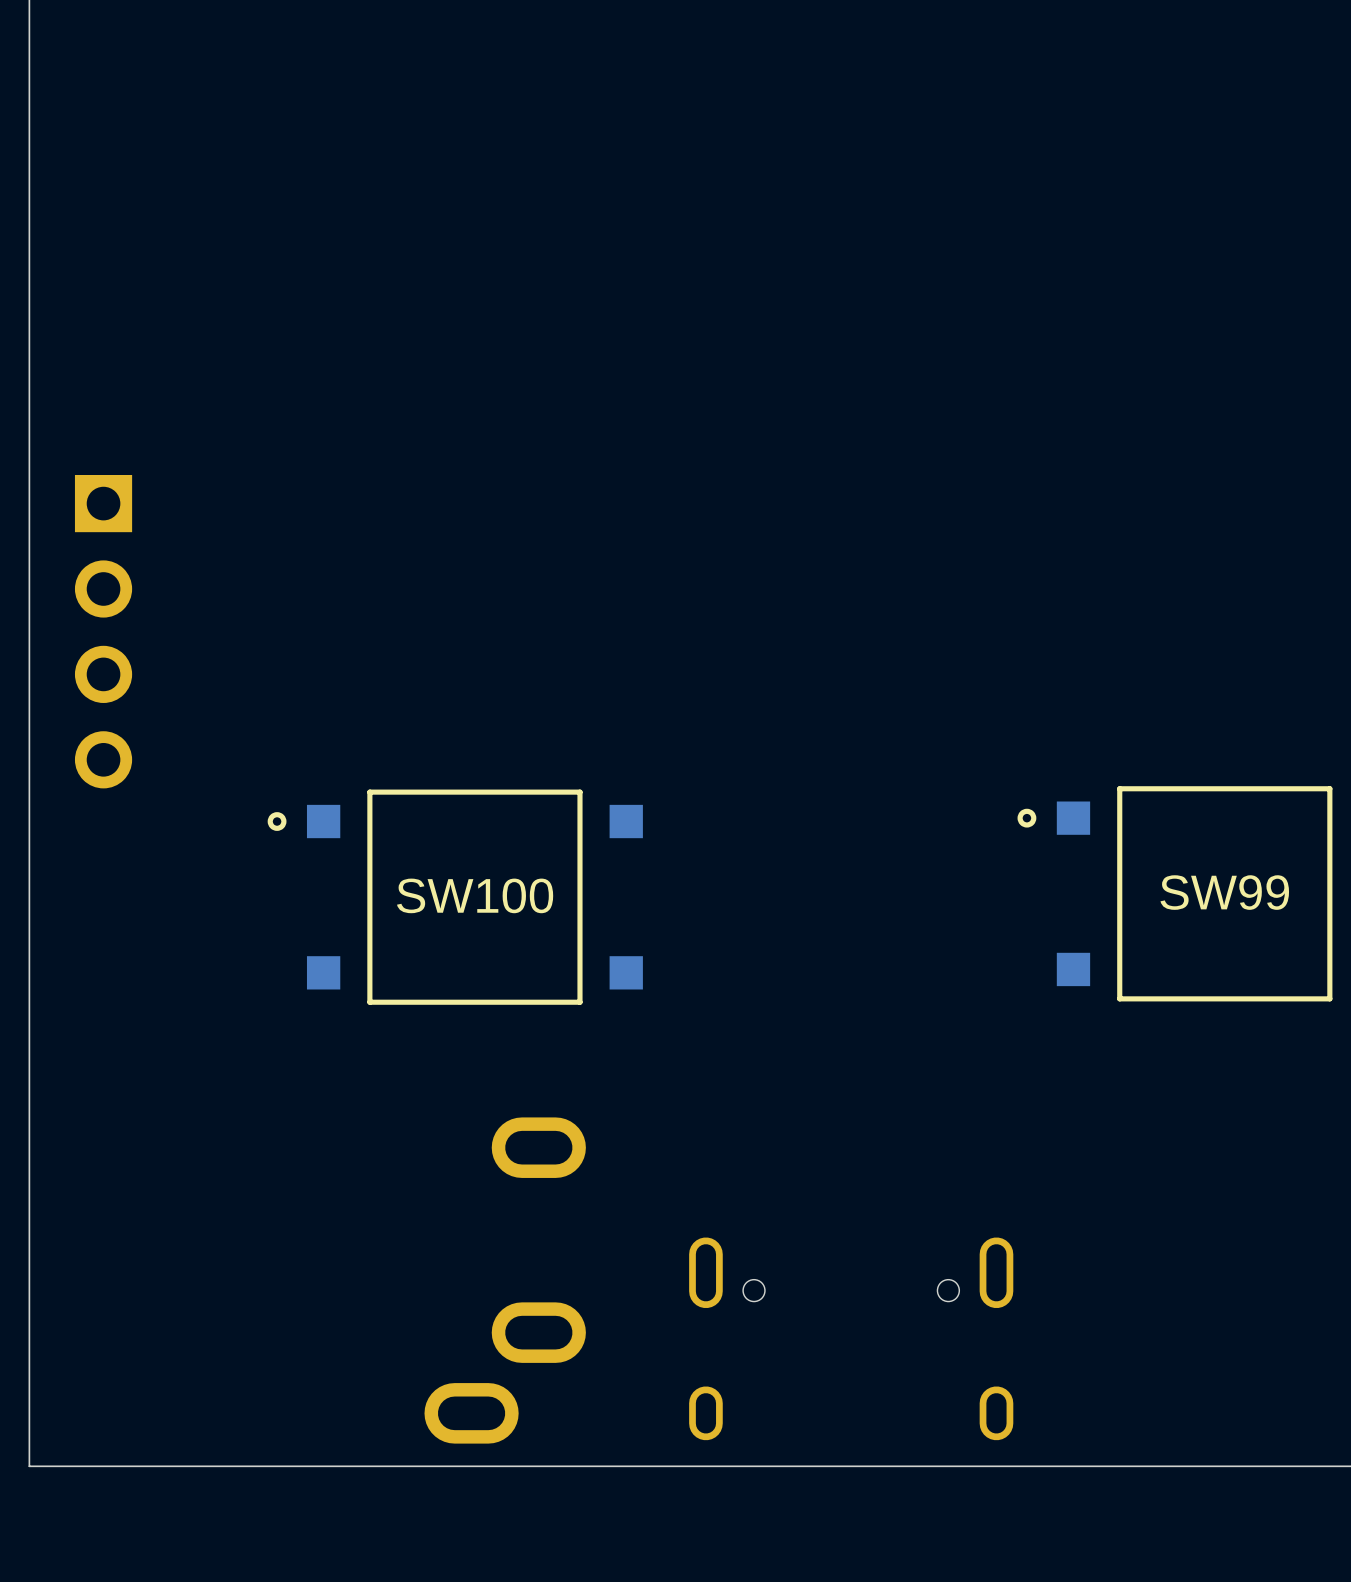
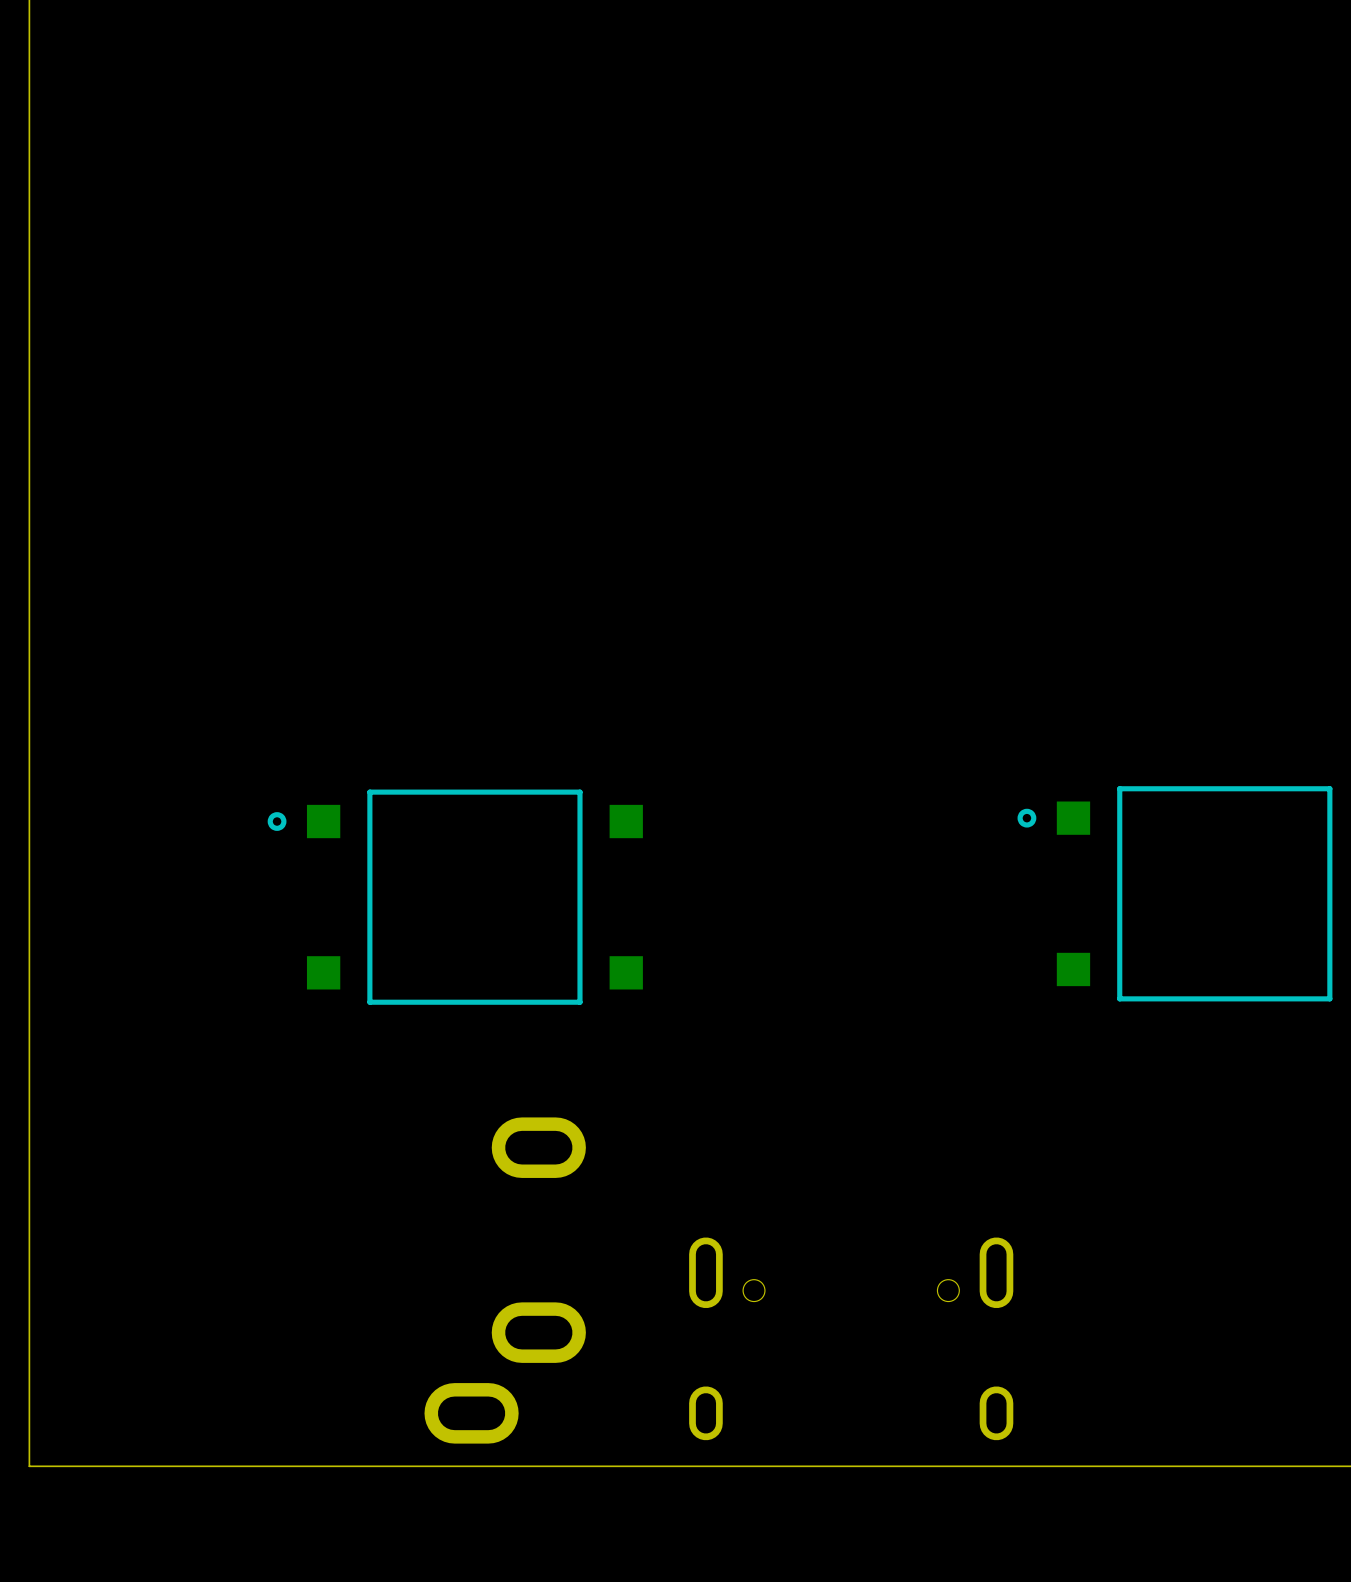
part: (103, 631) -> none
SW99 name: SW99 (1224, 892) -> none
SW100 name: SW100 (475, 895) -> none

